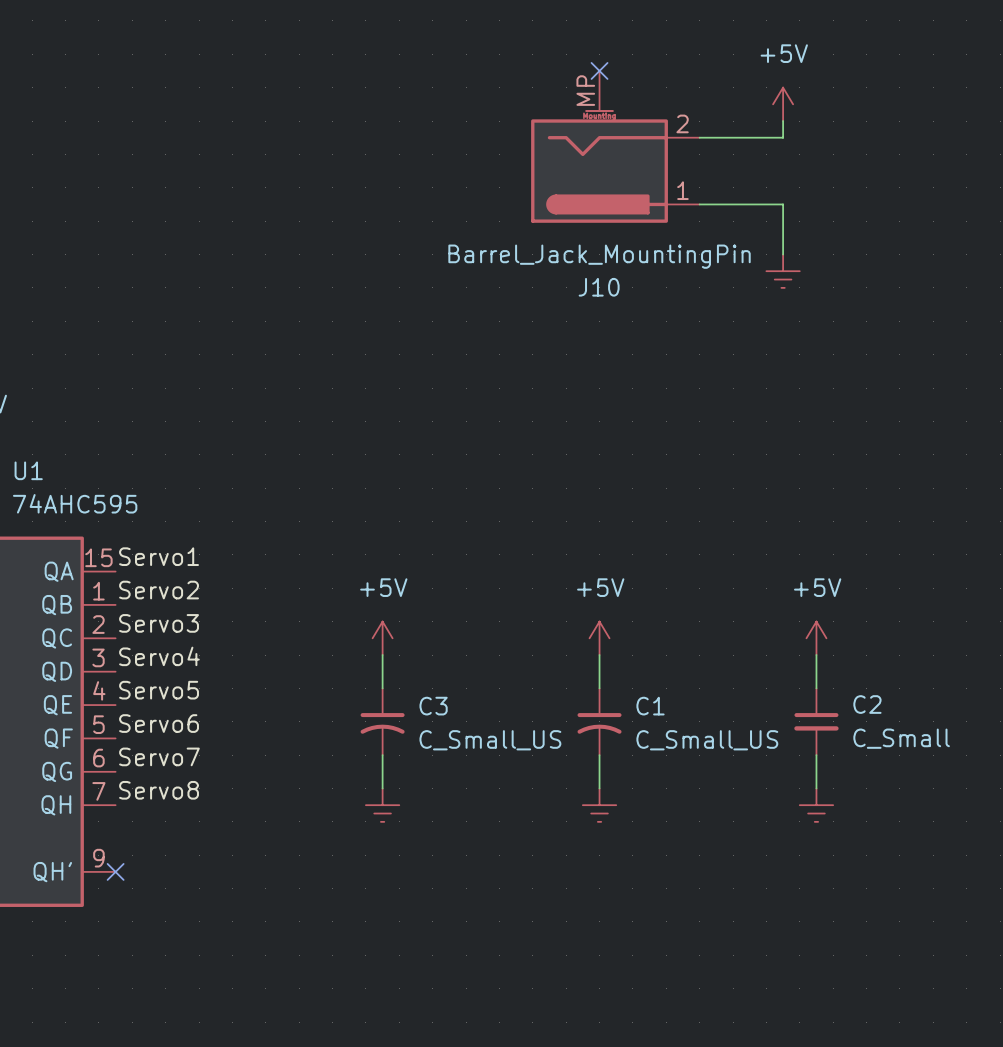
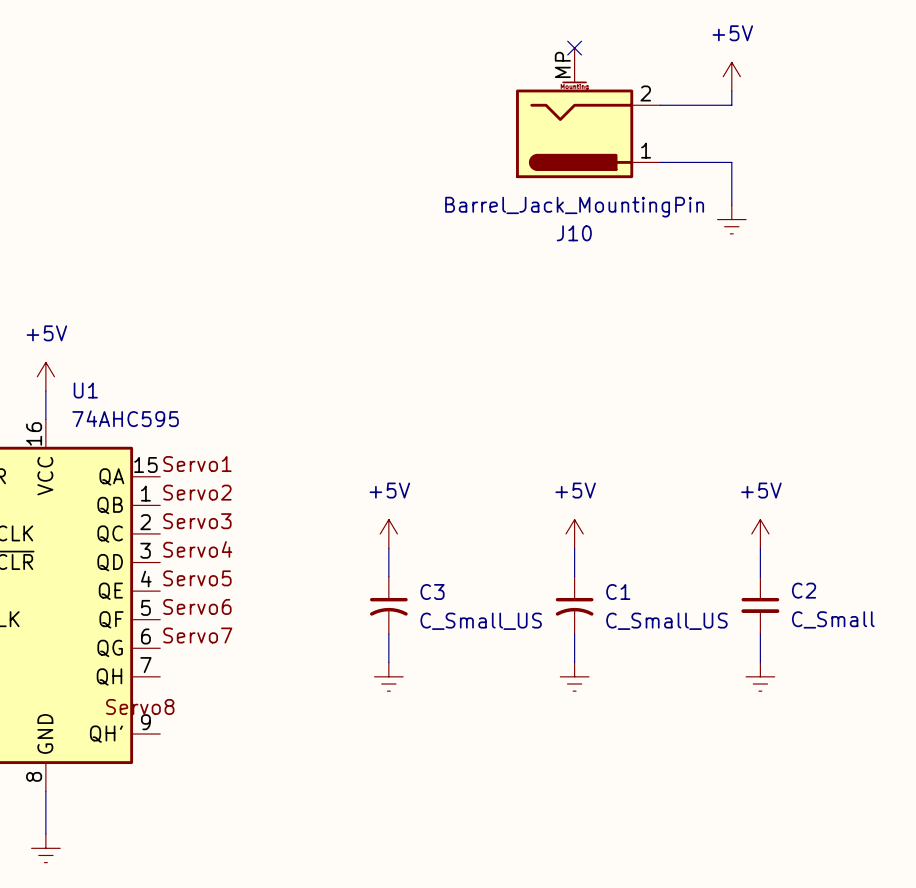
label position: Servo8 (159, 790) -> Servo8 (140, 706)
no-connect mark: (115, 871) -> none

